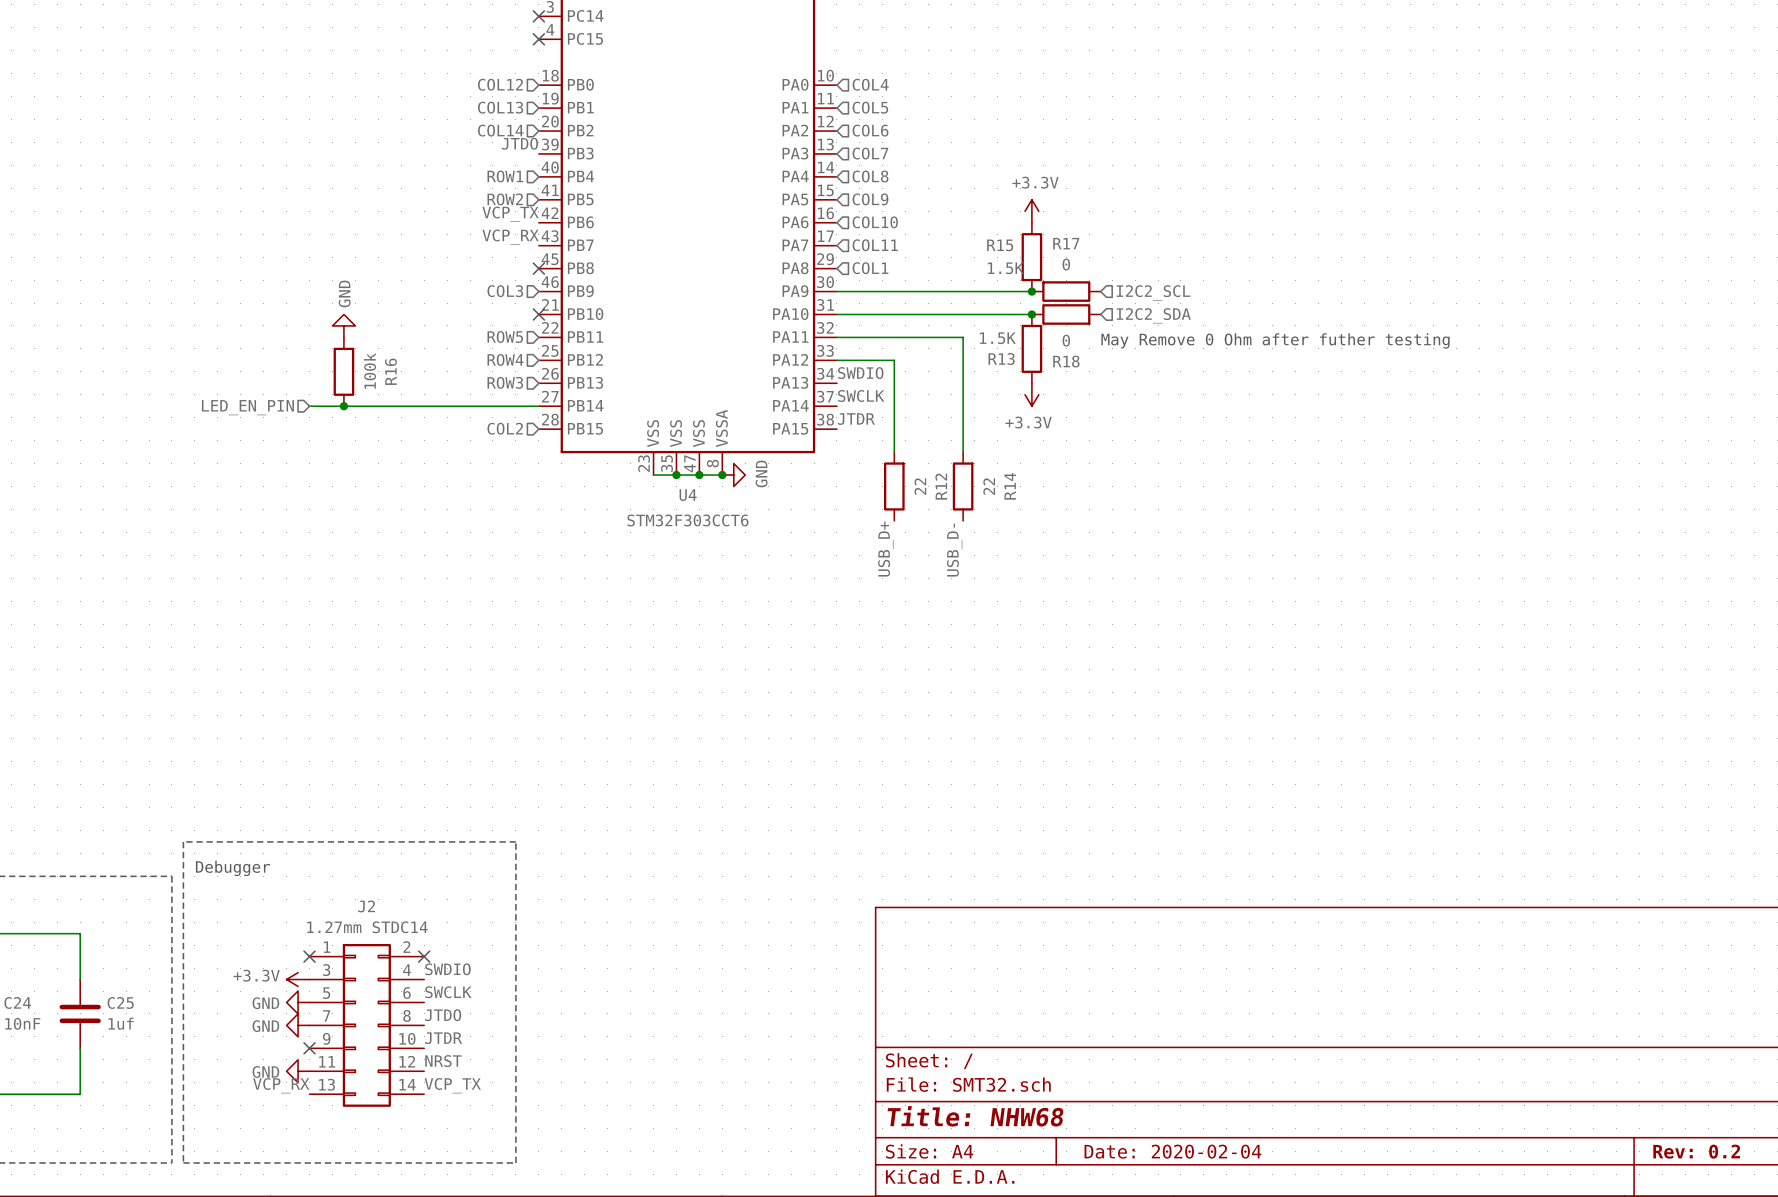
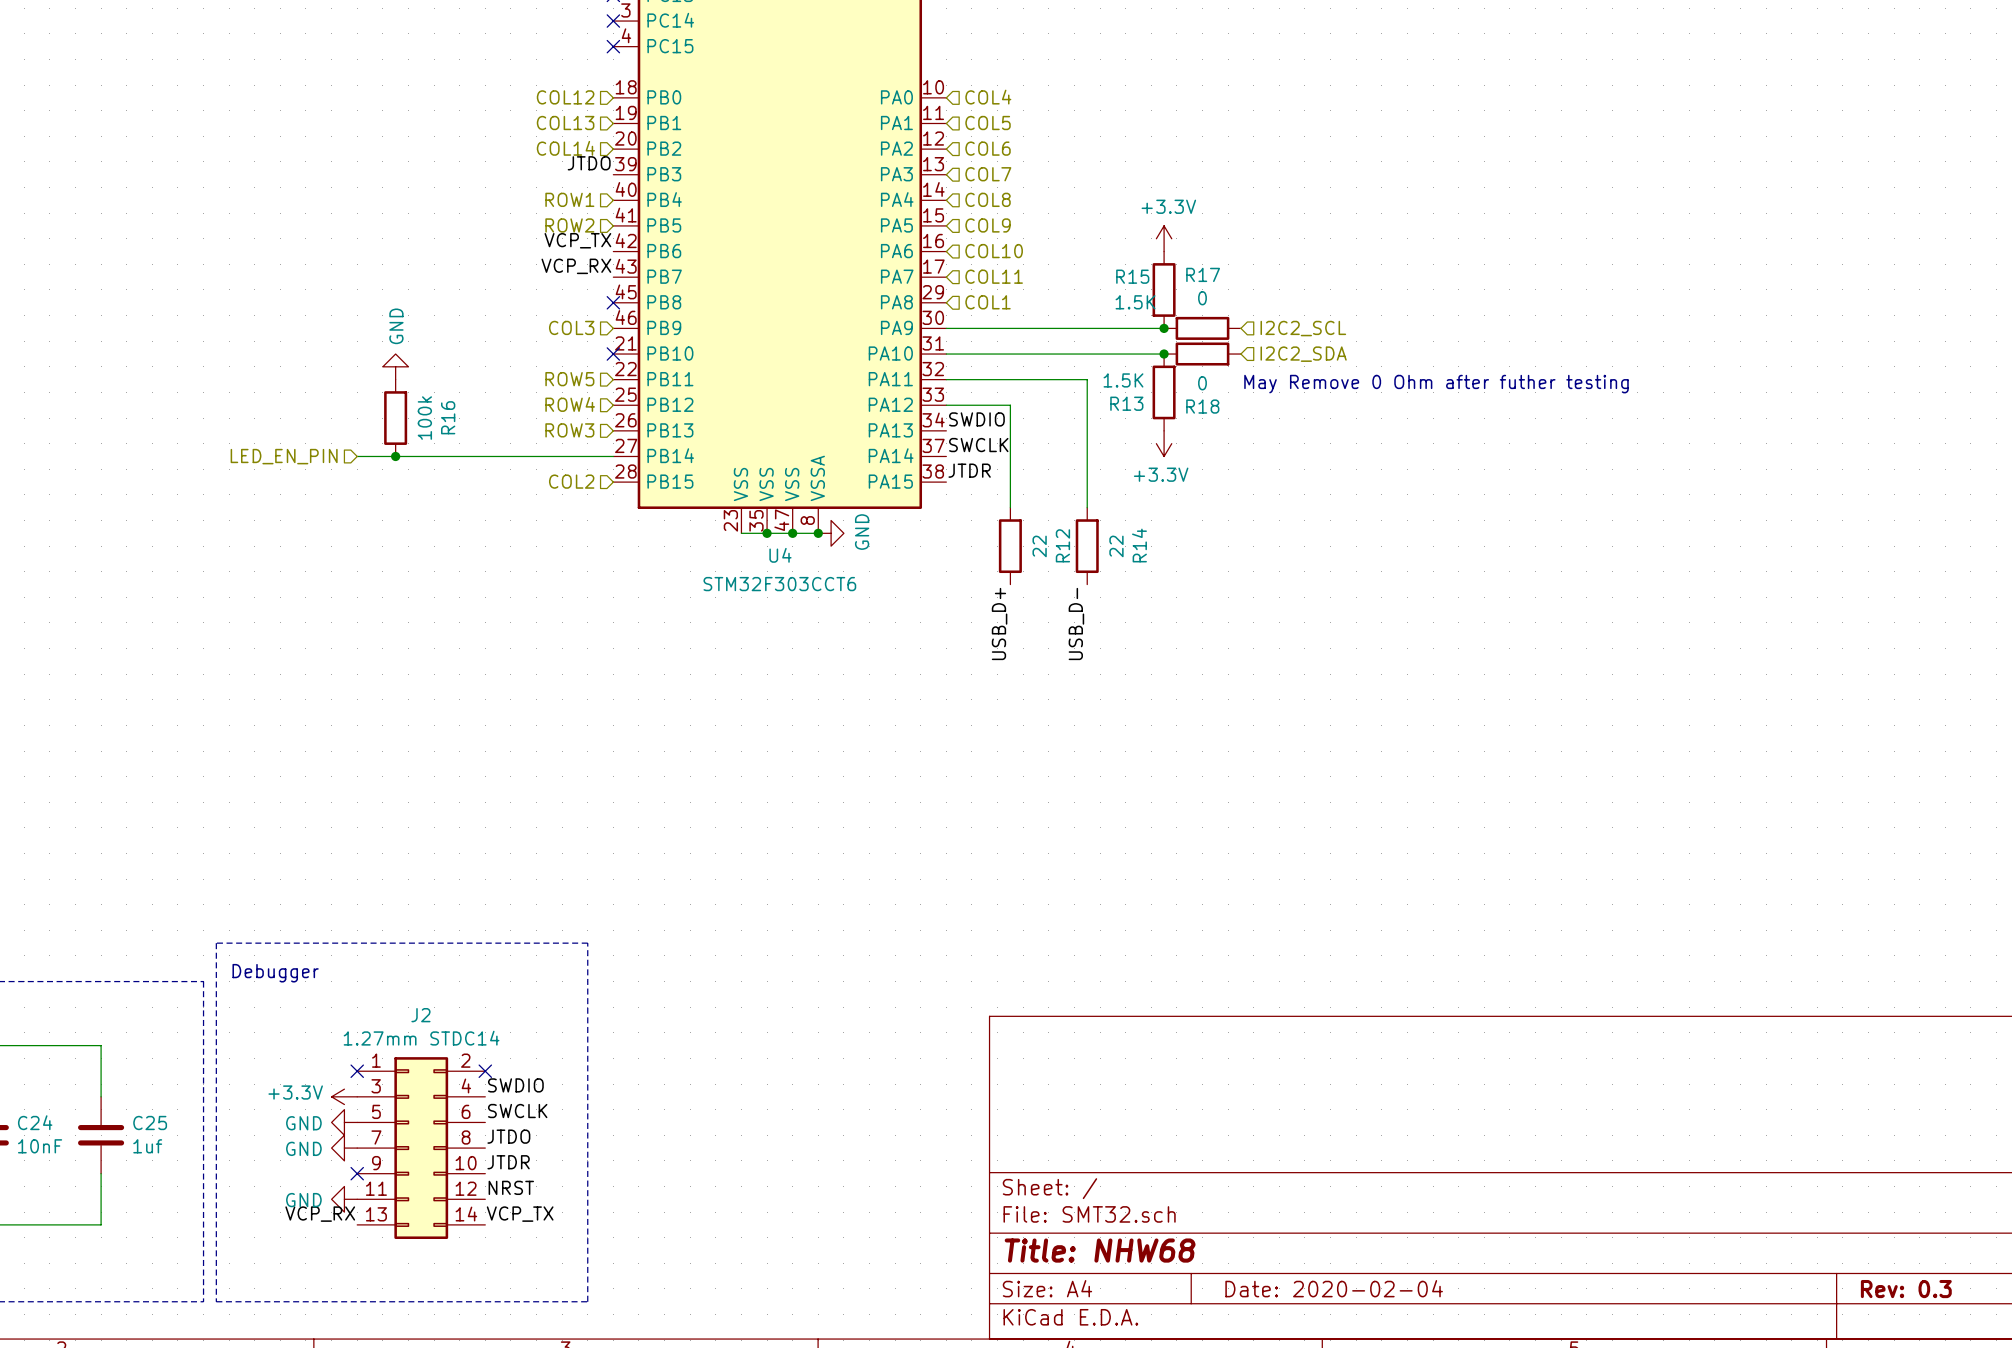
title block: Rev: 0.2 (1696, 1151) -> Rev: 0.3 (1906, 1289)

